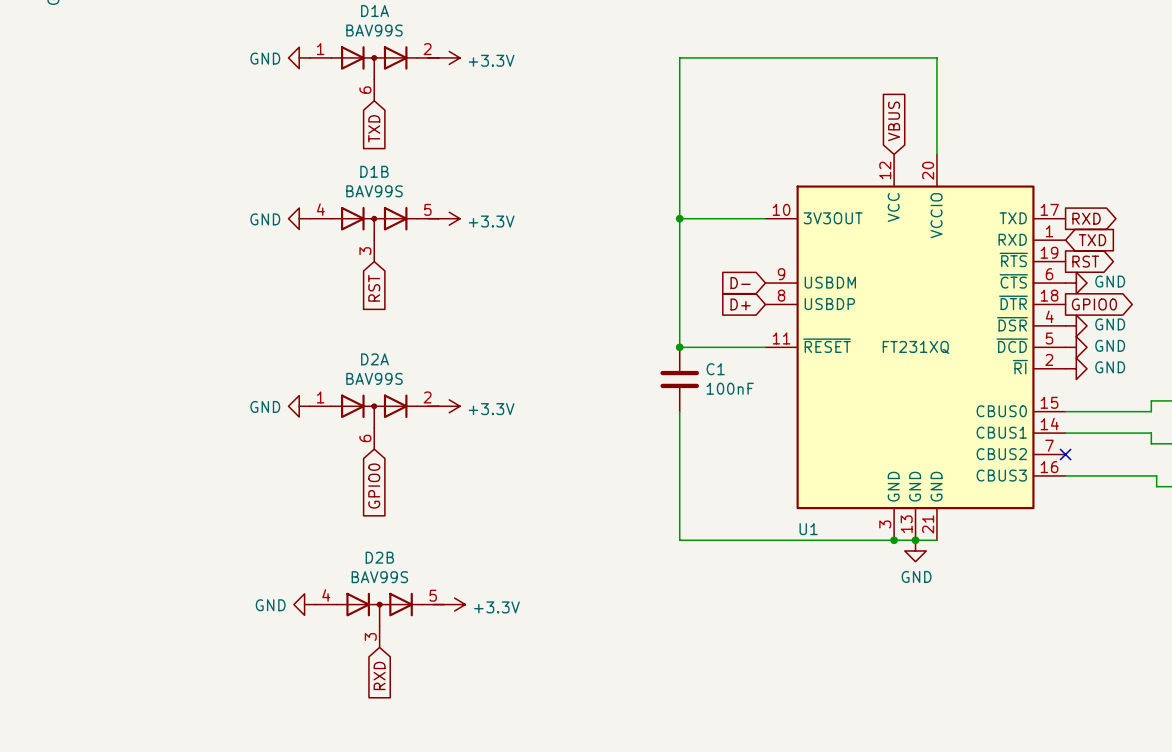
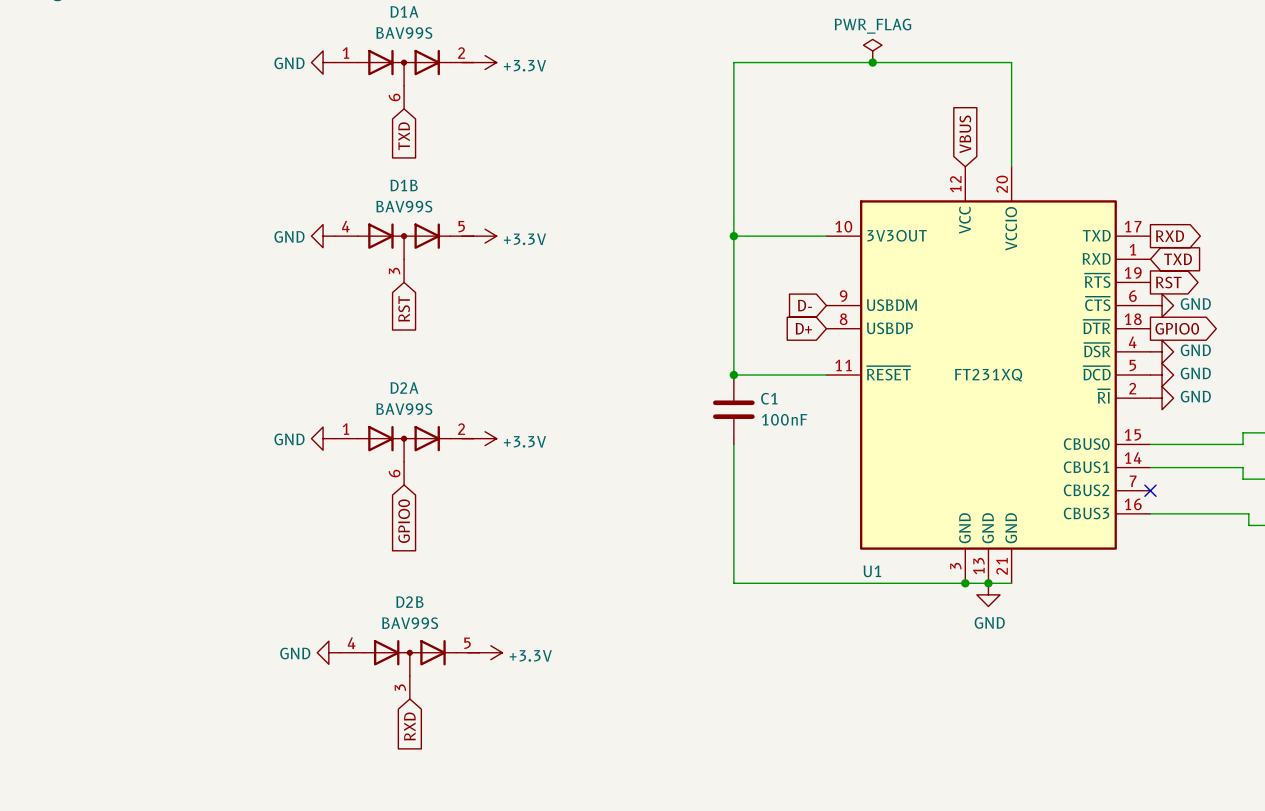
power symbol: none -> PWR_FLAG (872, 50)
junction: none -> (872, 62)

